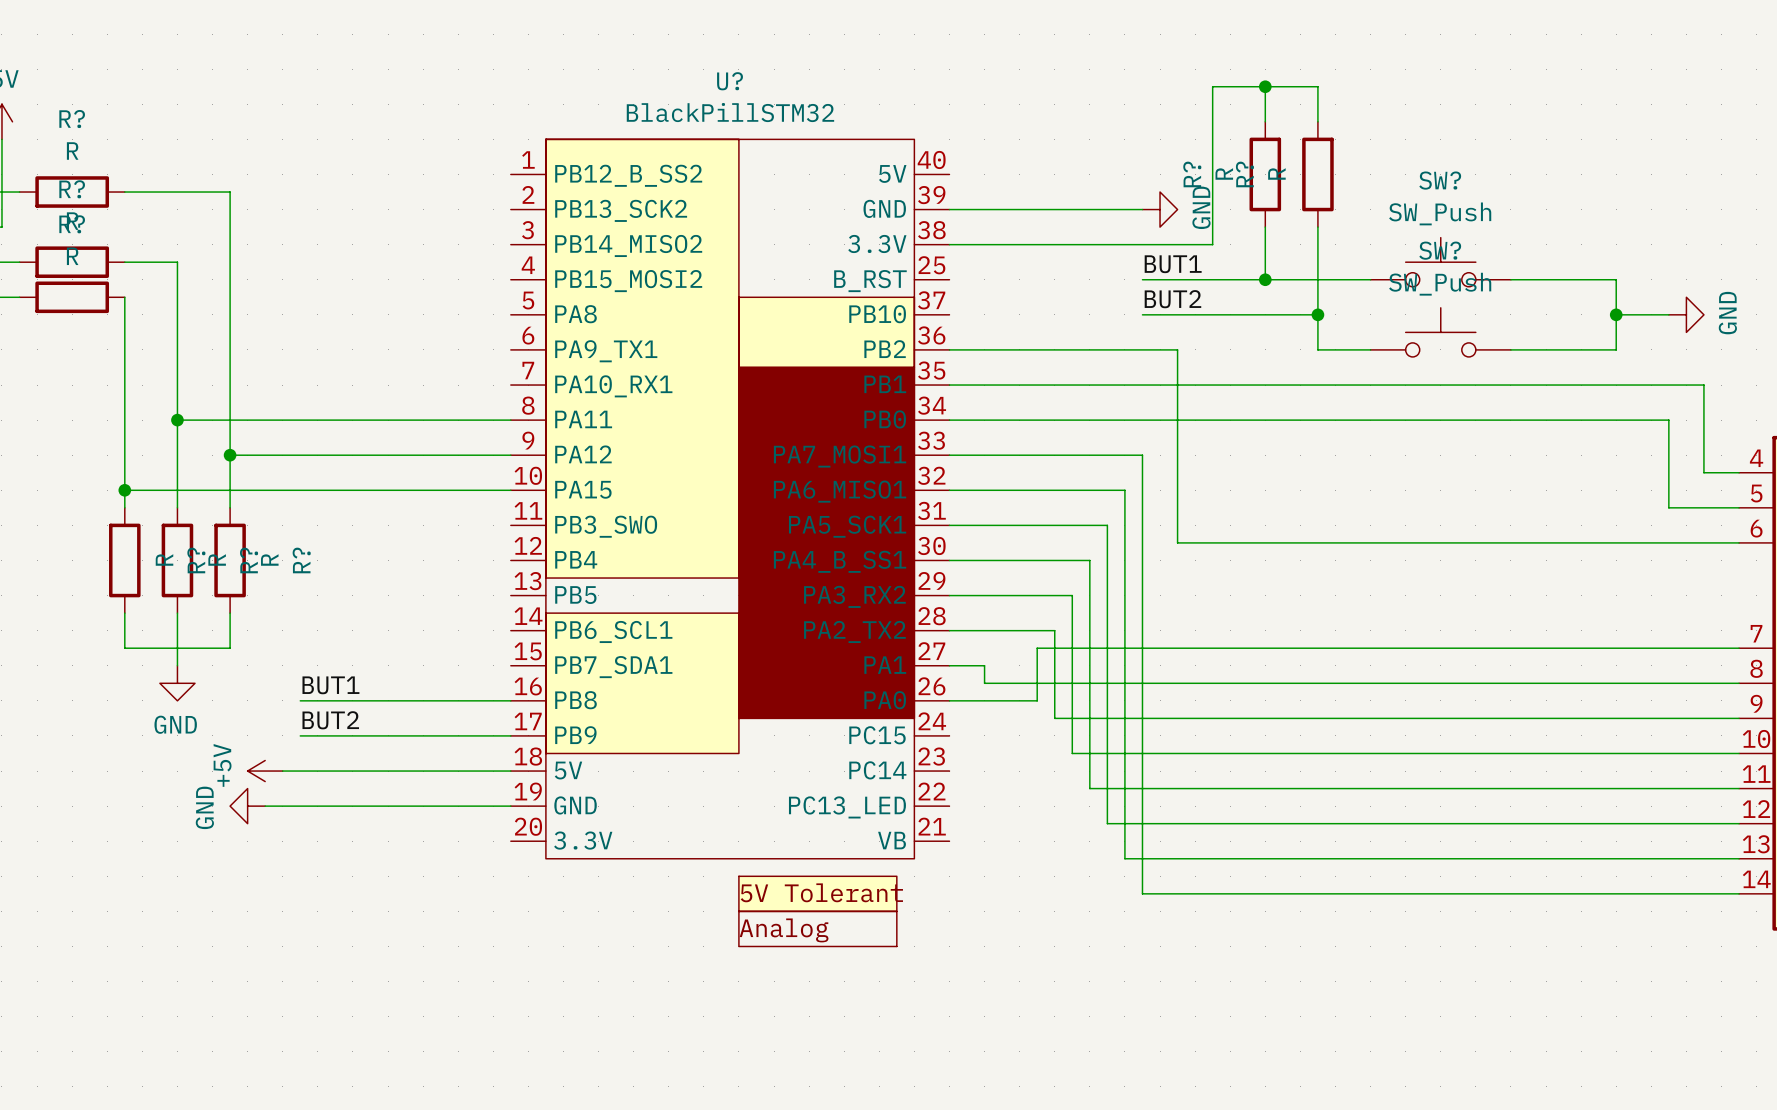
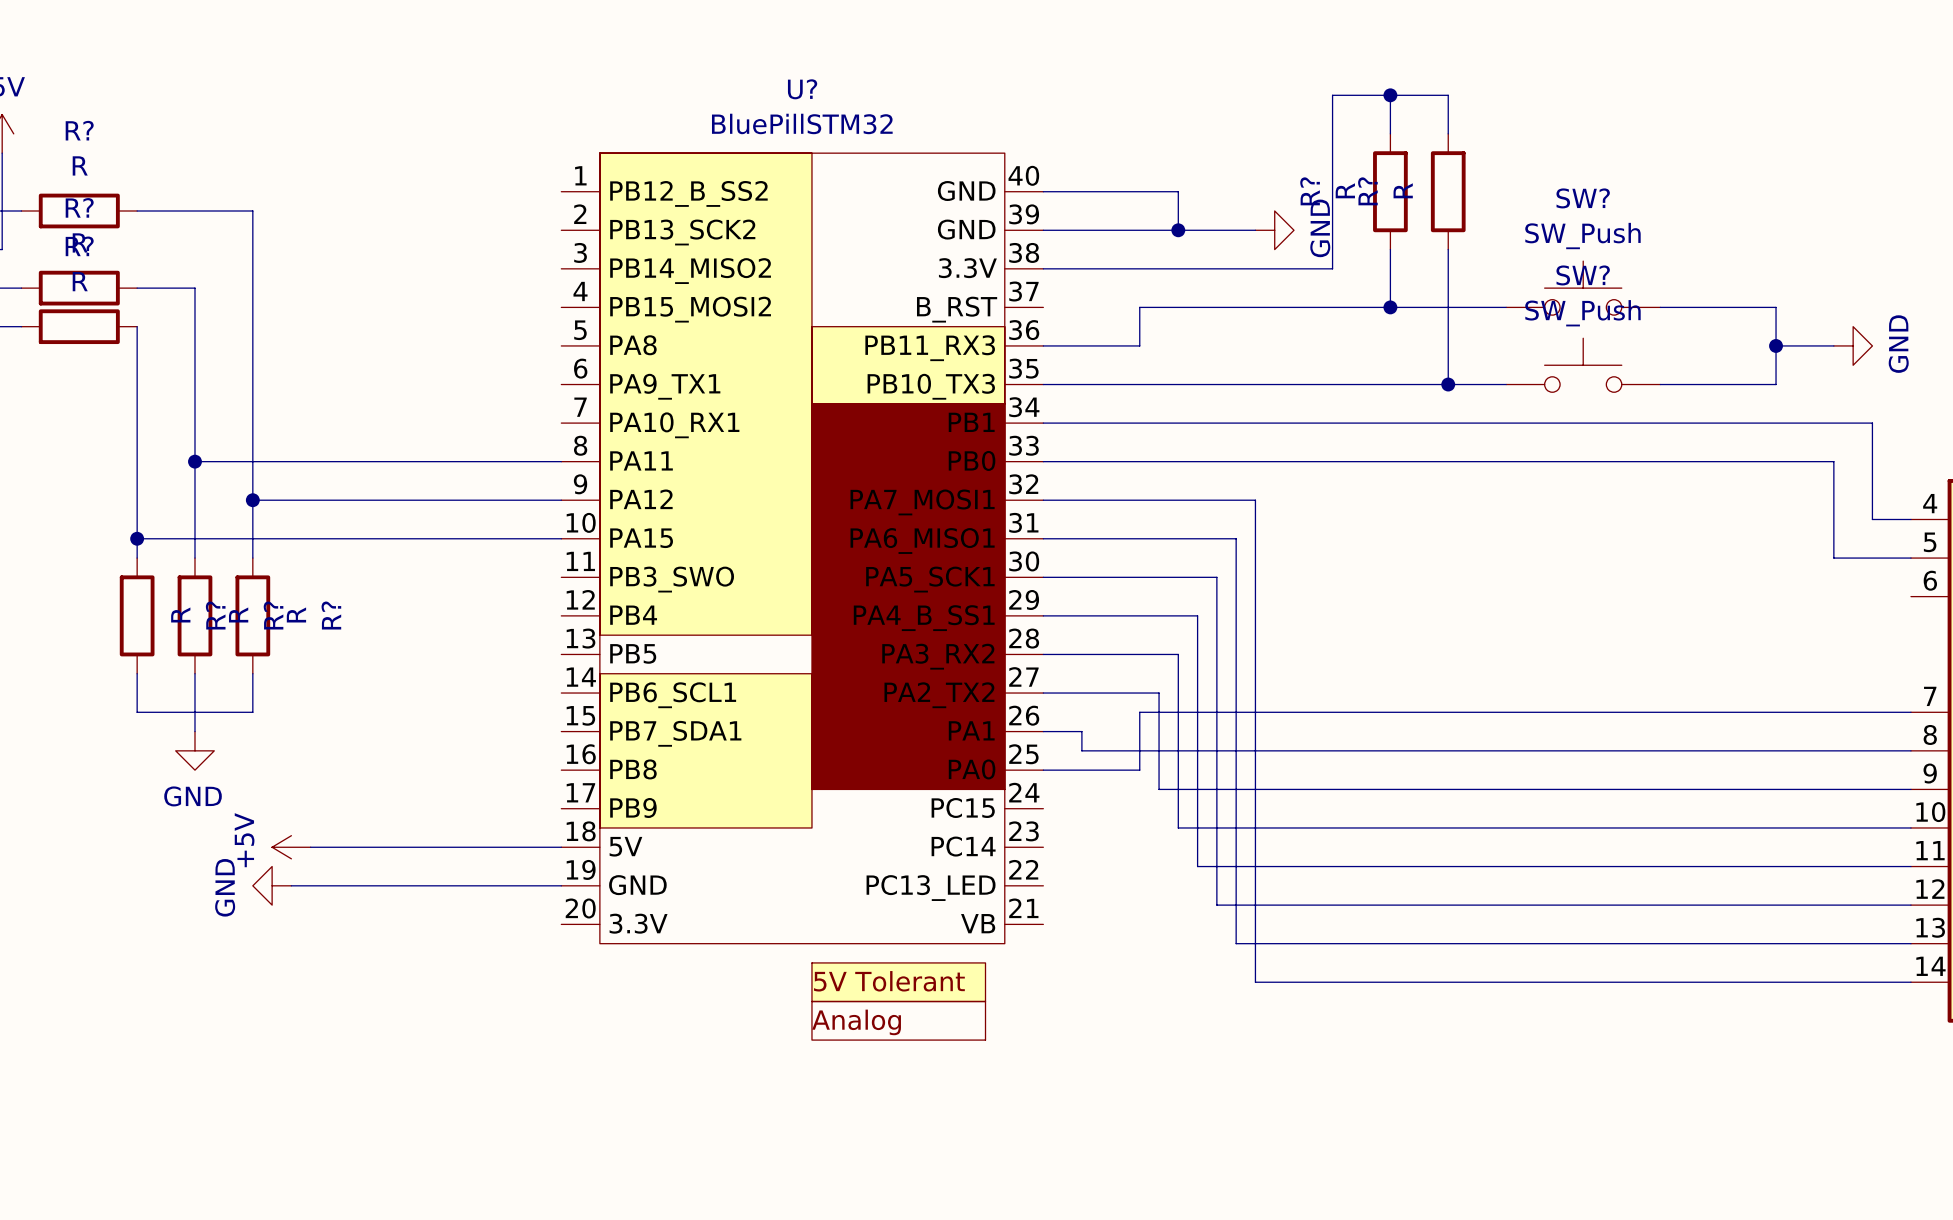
U? value: BlackPillSTM32 (730, 112) -> BluePillSTM32 (802, 123)
U? symbol: [510, 139, 950, 947] -> [561, 153, 1044, 1041]
wire: none -> (1043, 191) (1178, 191) (1178, 230)
junction: none -> (1178, 230)
label: BUT1 (1173, 264) -> none
wire: none -> (1255, 307) (1139, 307) (1139, 345) (1043, 345)
label: BUT2 (1172, 299) -> none
wire: (1142, 314) (1317, 314) -> none
junction position: (1317, 314) -> (1448, 384)
wire: (1177, 349) (1177, 542) (1739, 542) -> (1294, 384) (1448, 384)
label: BUT1 (330, 685) -> none
wire: (300, 700) (510, 700) -> none
label: BUT2 (330, 720) -> none
wire: (300, 735) (510, 735) -> none

